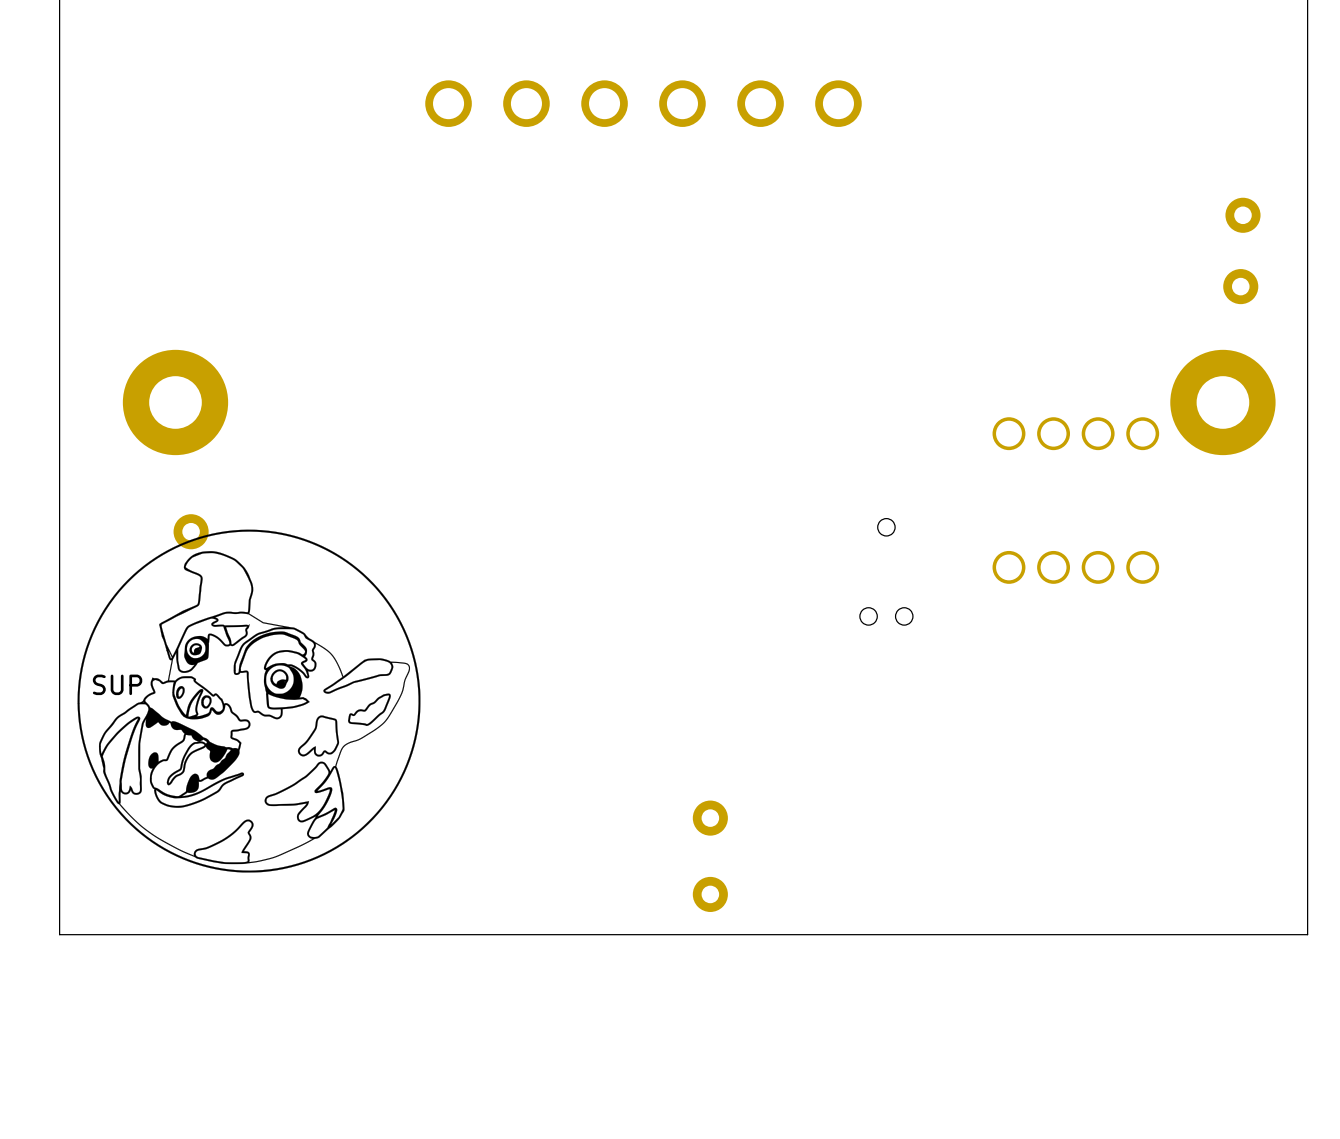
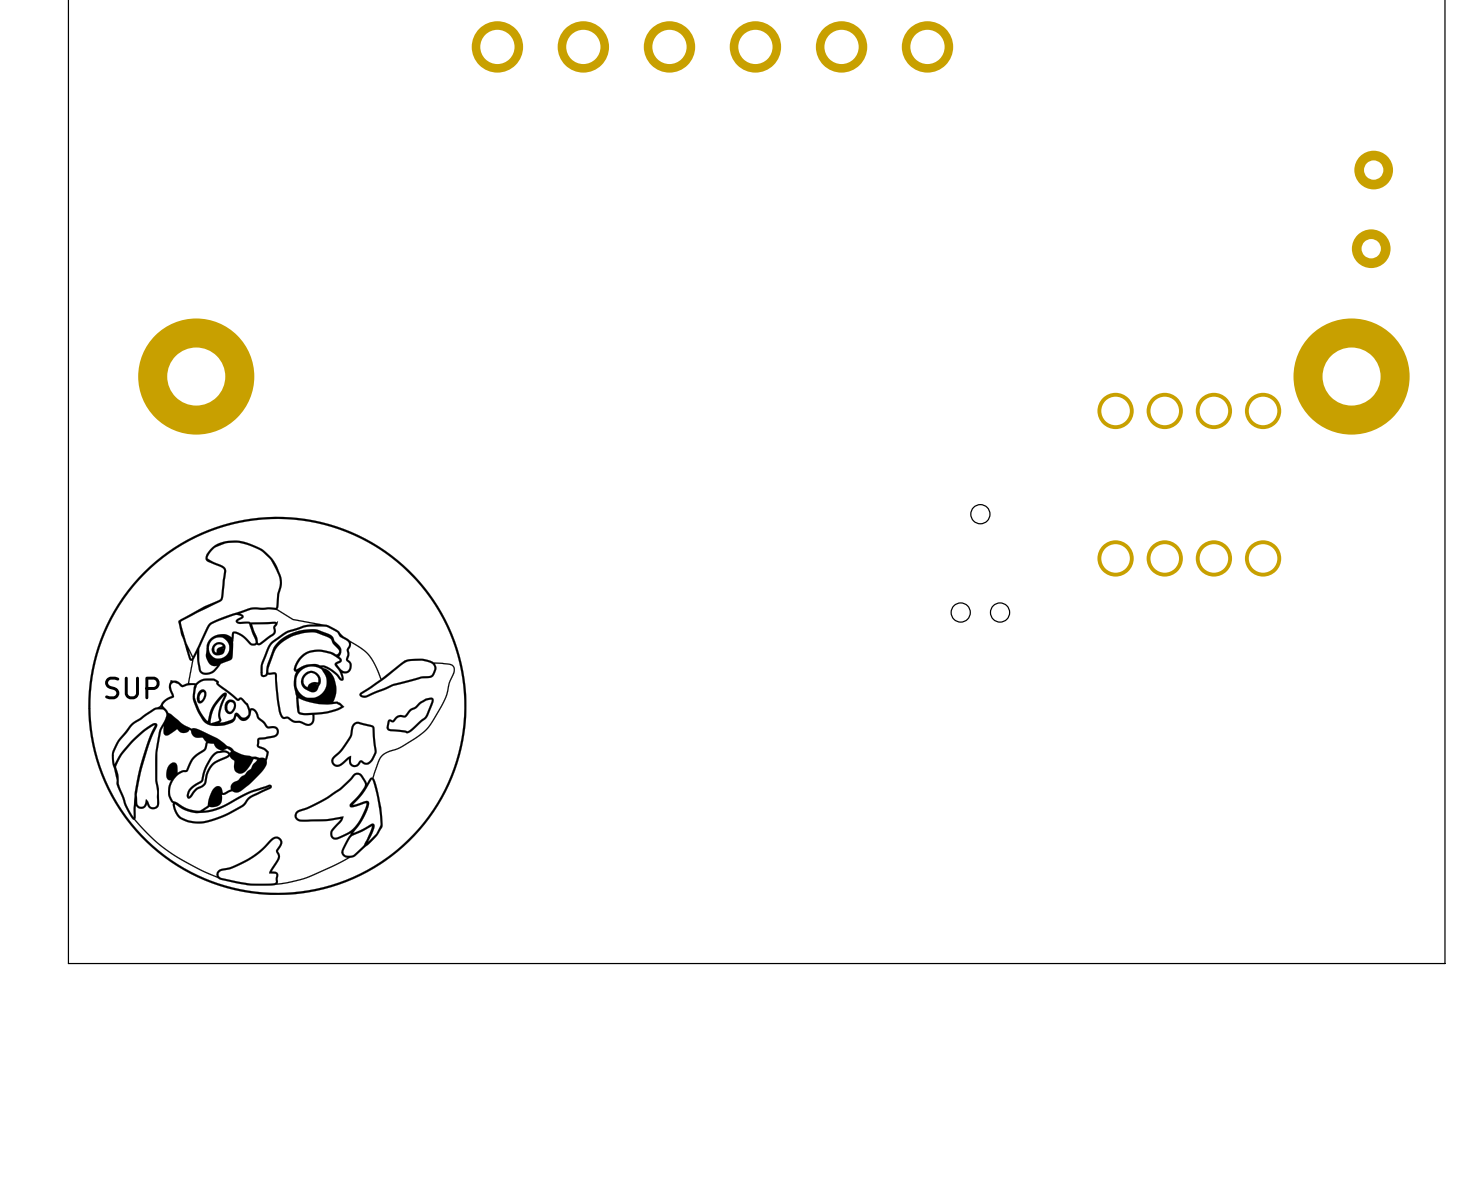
part: (191, 531) -> none
part: (710, 818) -> none
part: (710, 894) -> none

